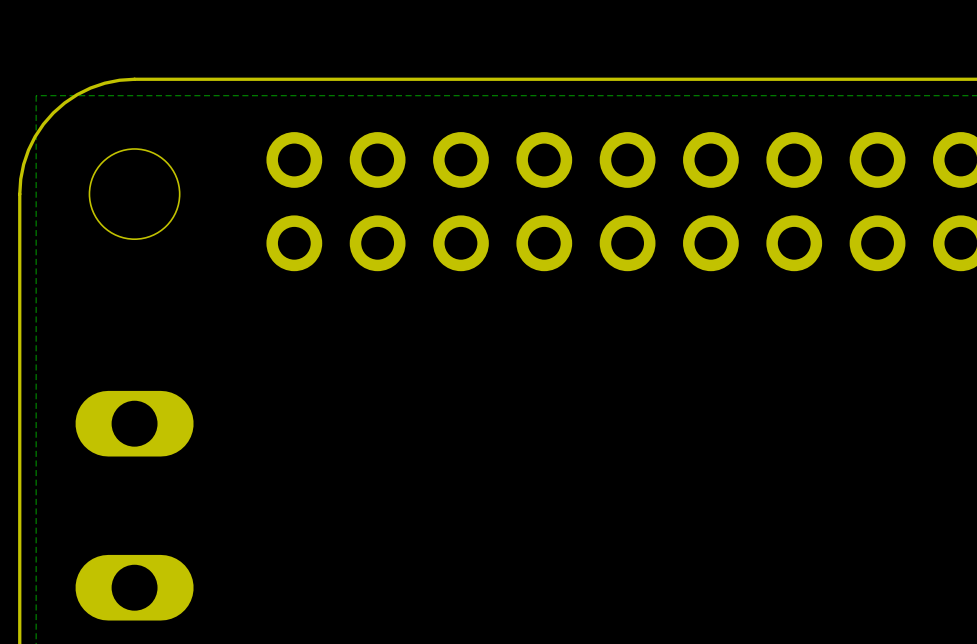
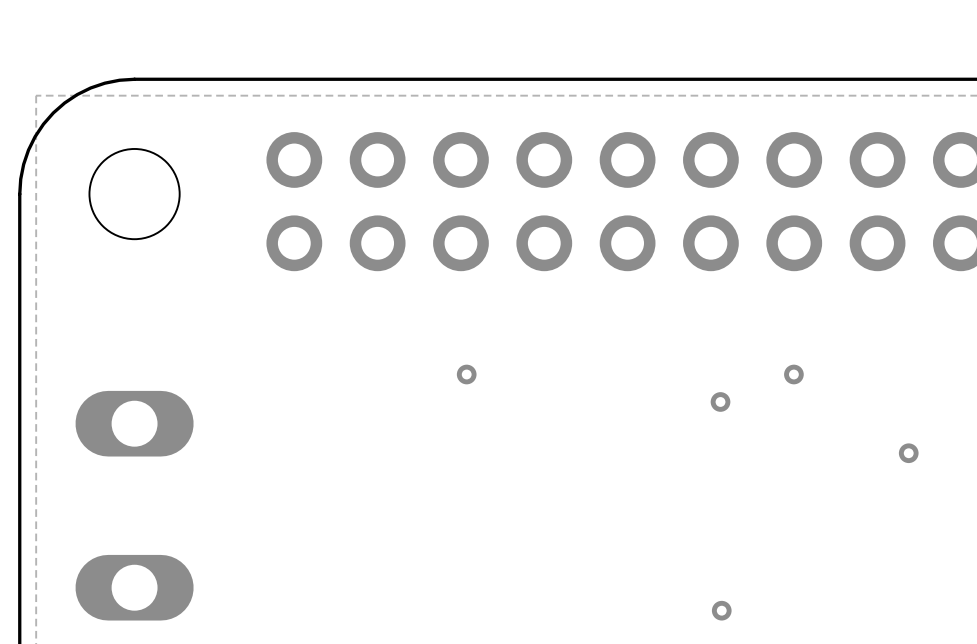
via: none -> (466, 374)
via: none -> (793, 374)
via: none -> (720, 401)
via: none -> (908, 453)
via: none -> (721, 610)

